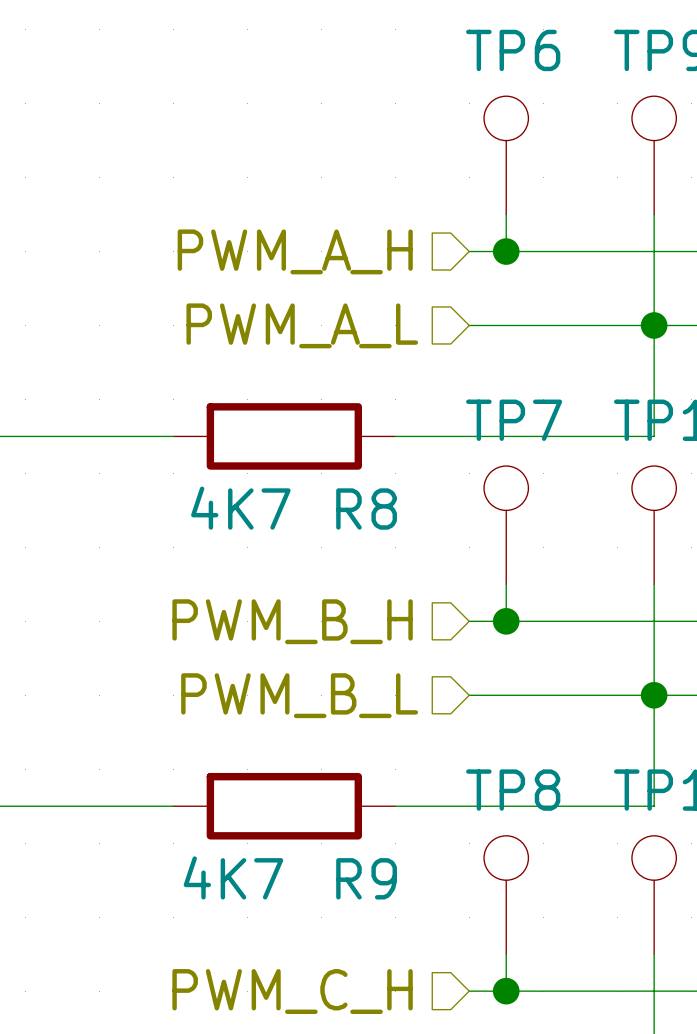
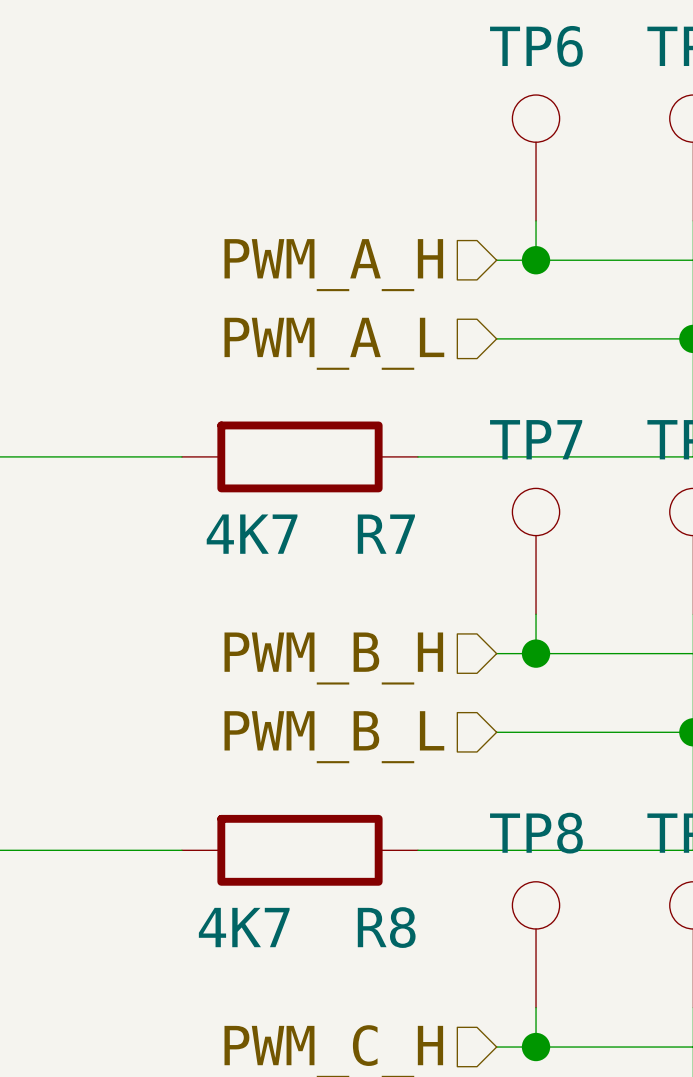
R8 name: R8 (366, 509) -> R7 (386, 534)
R9 name: R9 (366, 878) -> R8 (386, 927)

